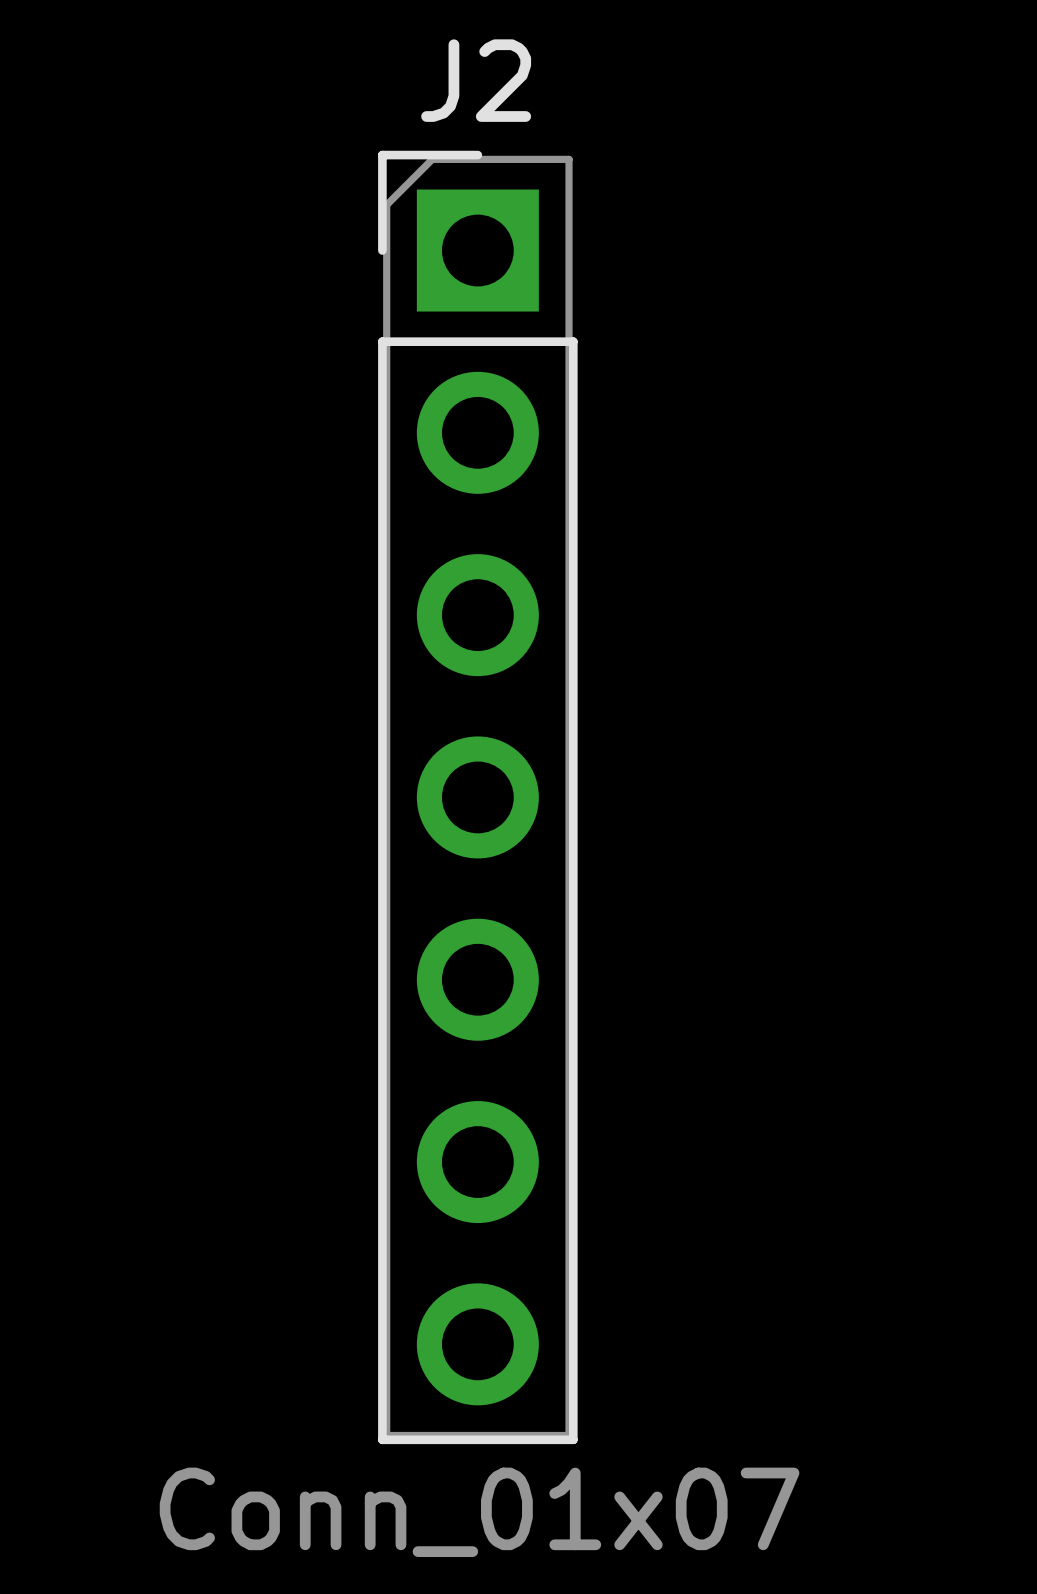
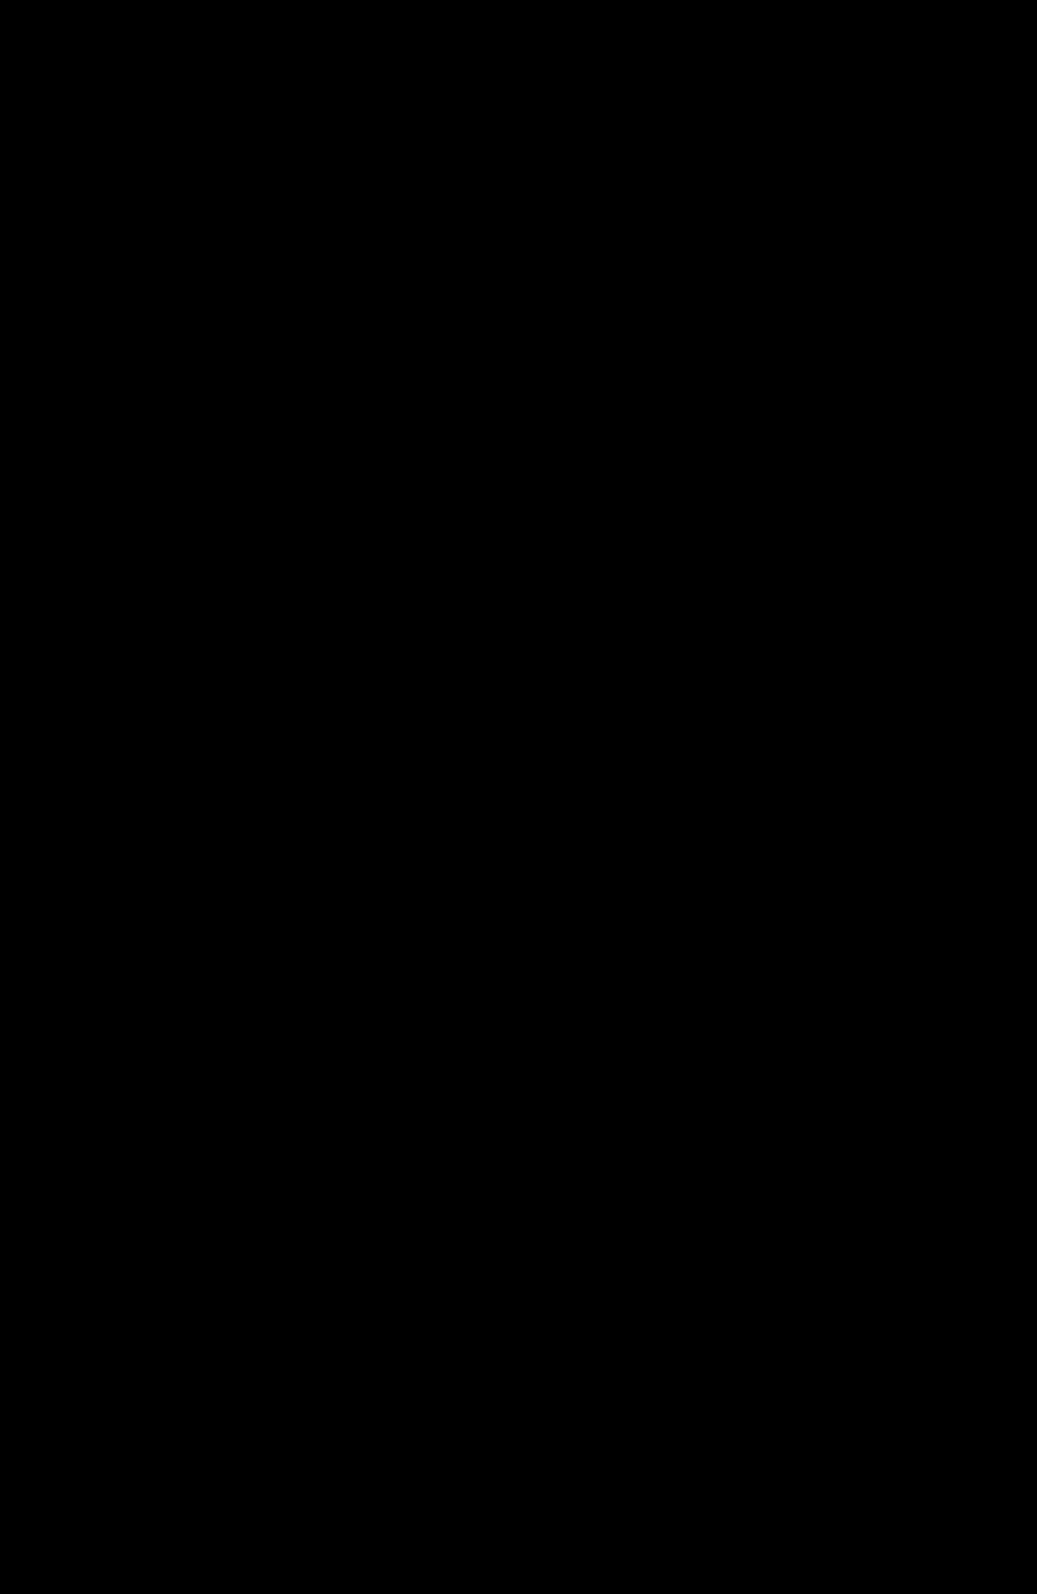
J2: Conn_01x07 (477, 797) -> none

